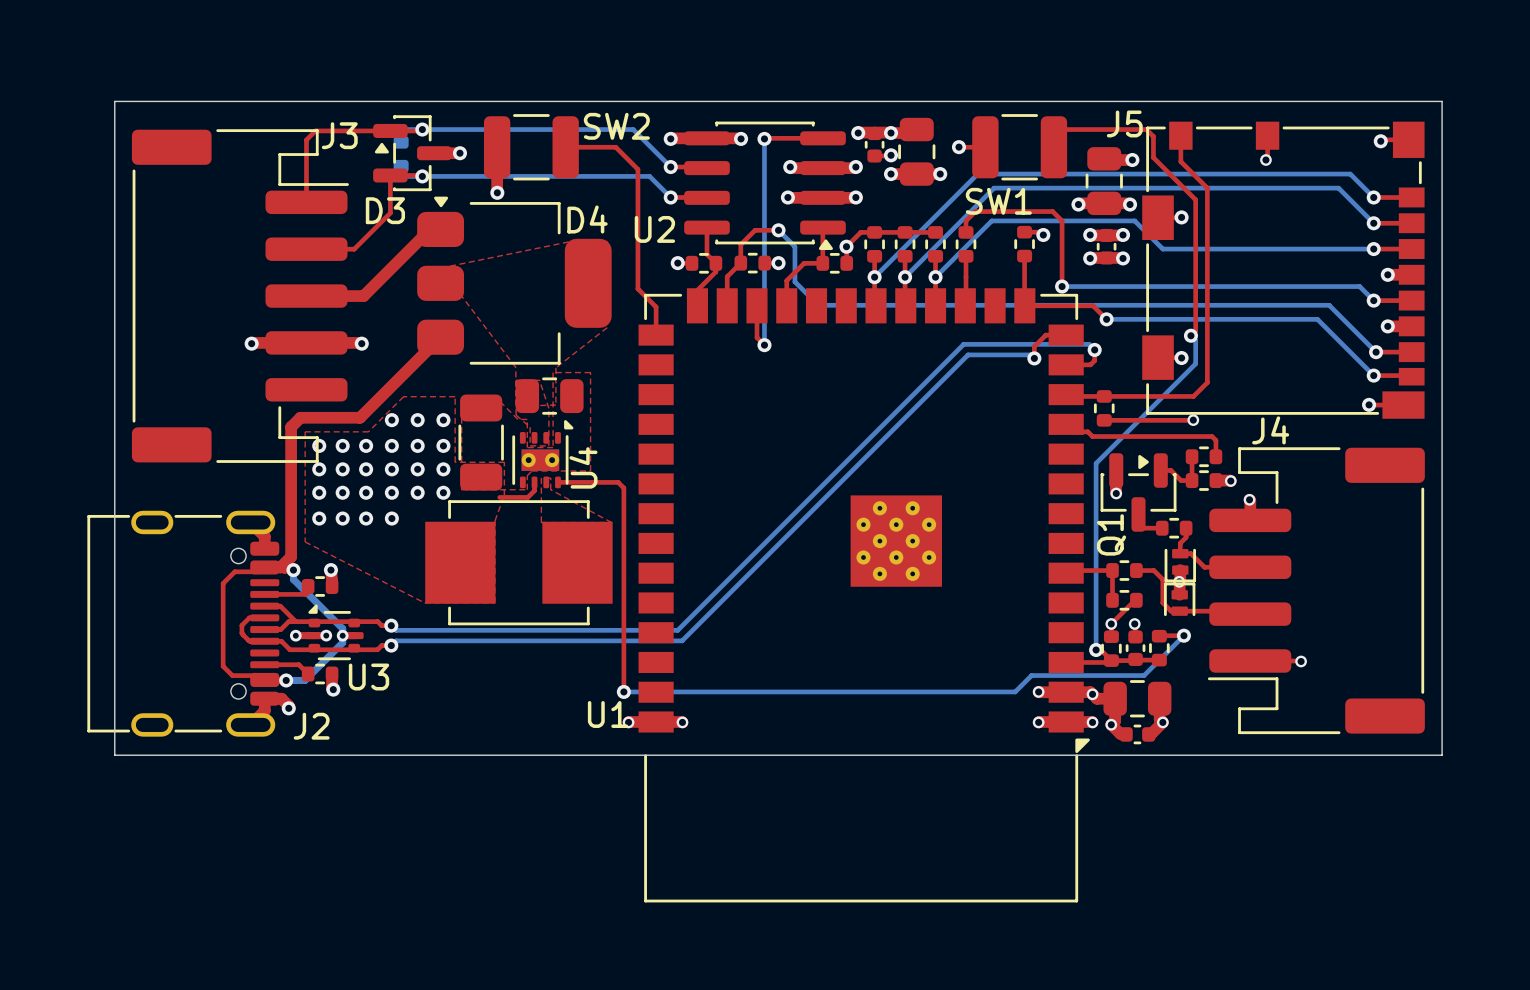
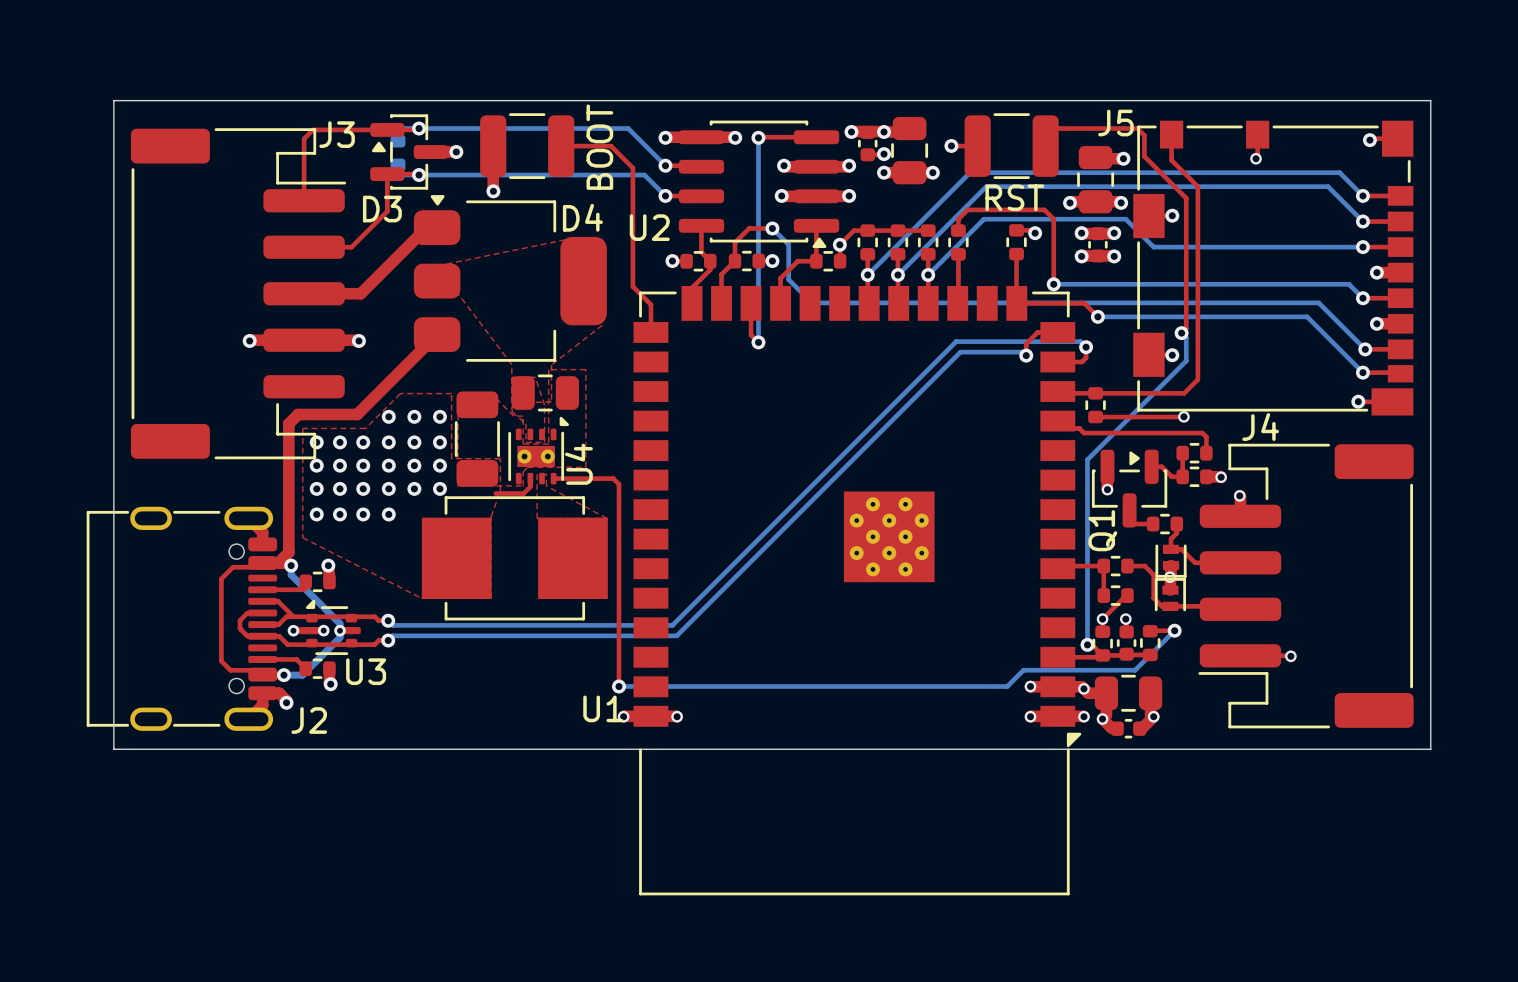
SW2 name: SW2 (616, 126) -> none
text: none -> BOOT (599, 147)
text: none -> RST (1014, 197)
SW1 name: SW1 (998, 201) -> none

